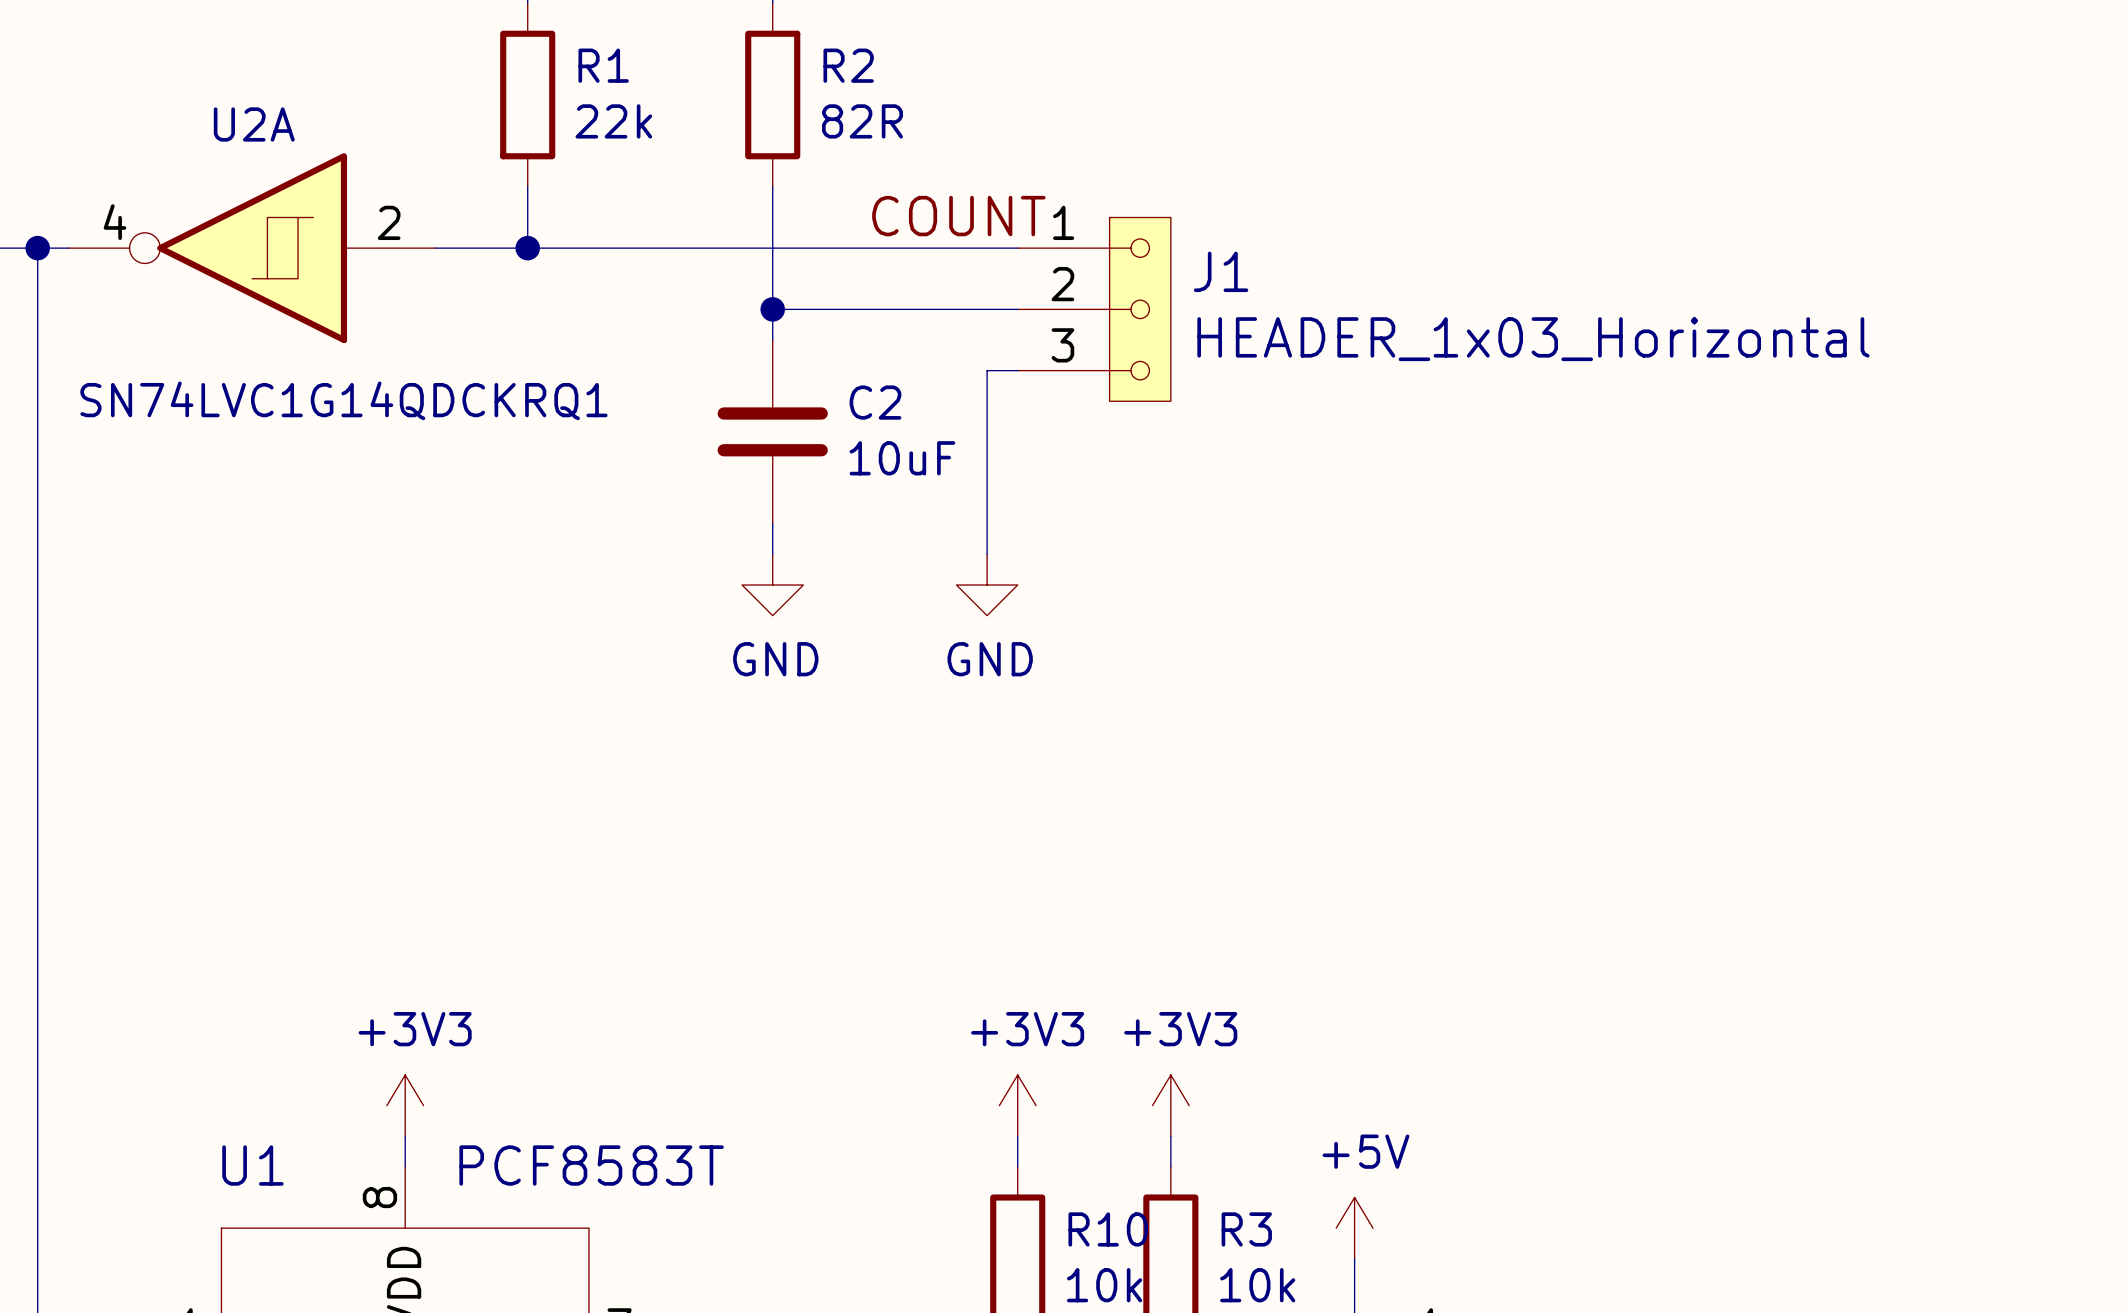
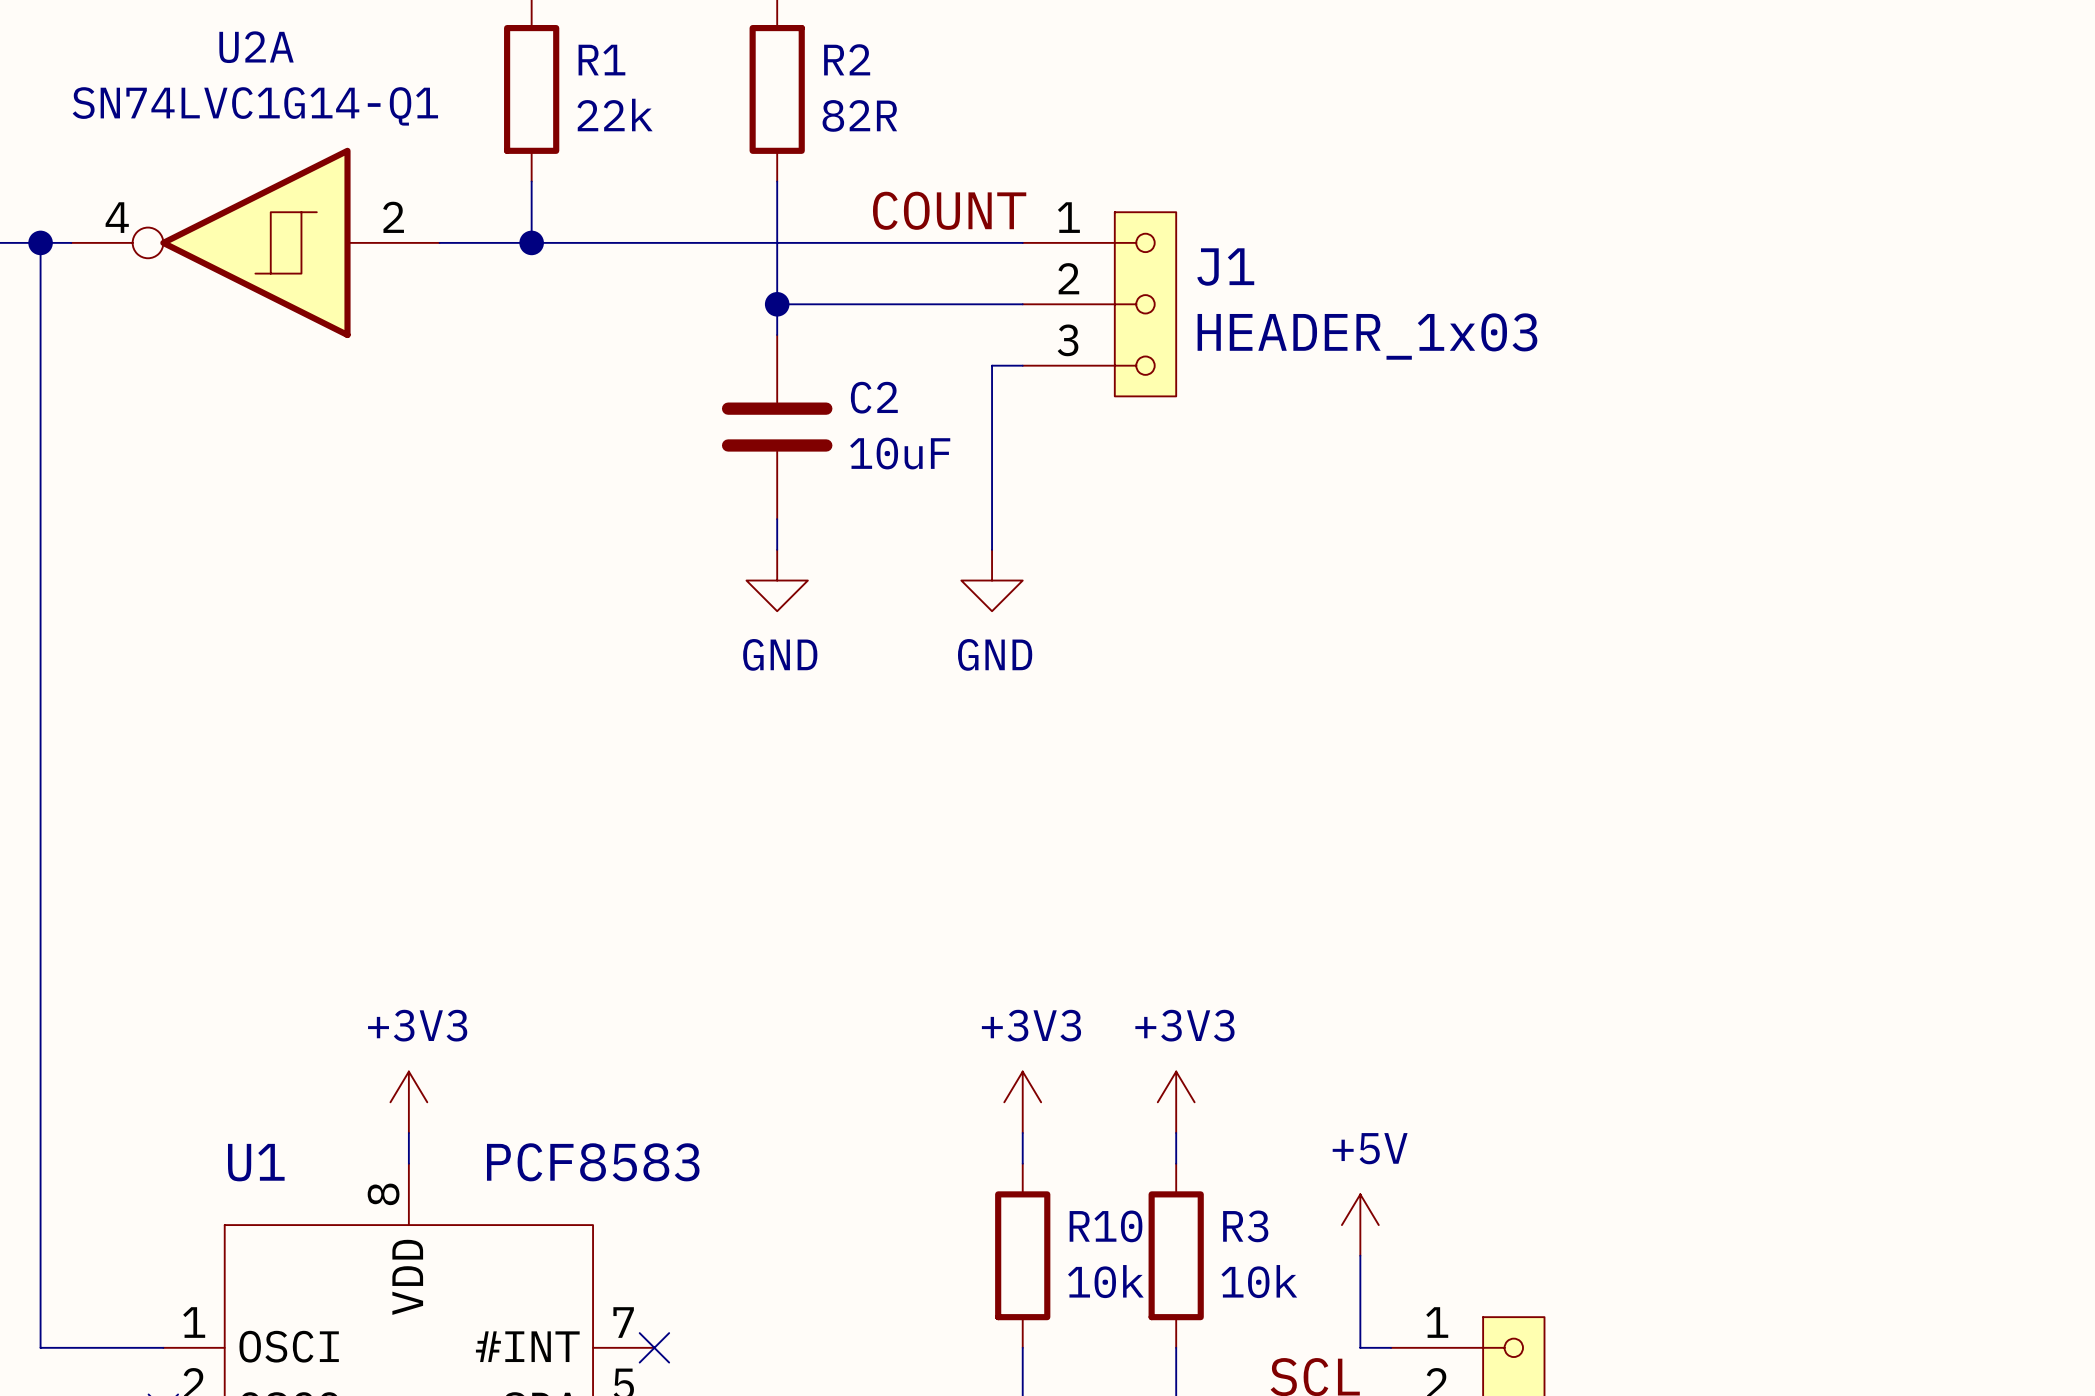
U2A name position: U2A (254, 124) -> U2A (256, 47)
J1 value: HEADER_1x03_Horizontal (1533, 339) -> HEADER_1x03 (1367, 336)
U2A value: SN74LVC1G14QDCKRQ1 (343, 400) -> SN74LVC1G14-Q1 (255, 106)
U1 value: PCF8583T (591, 1165) -> PCF8583 (593, 1162)

